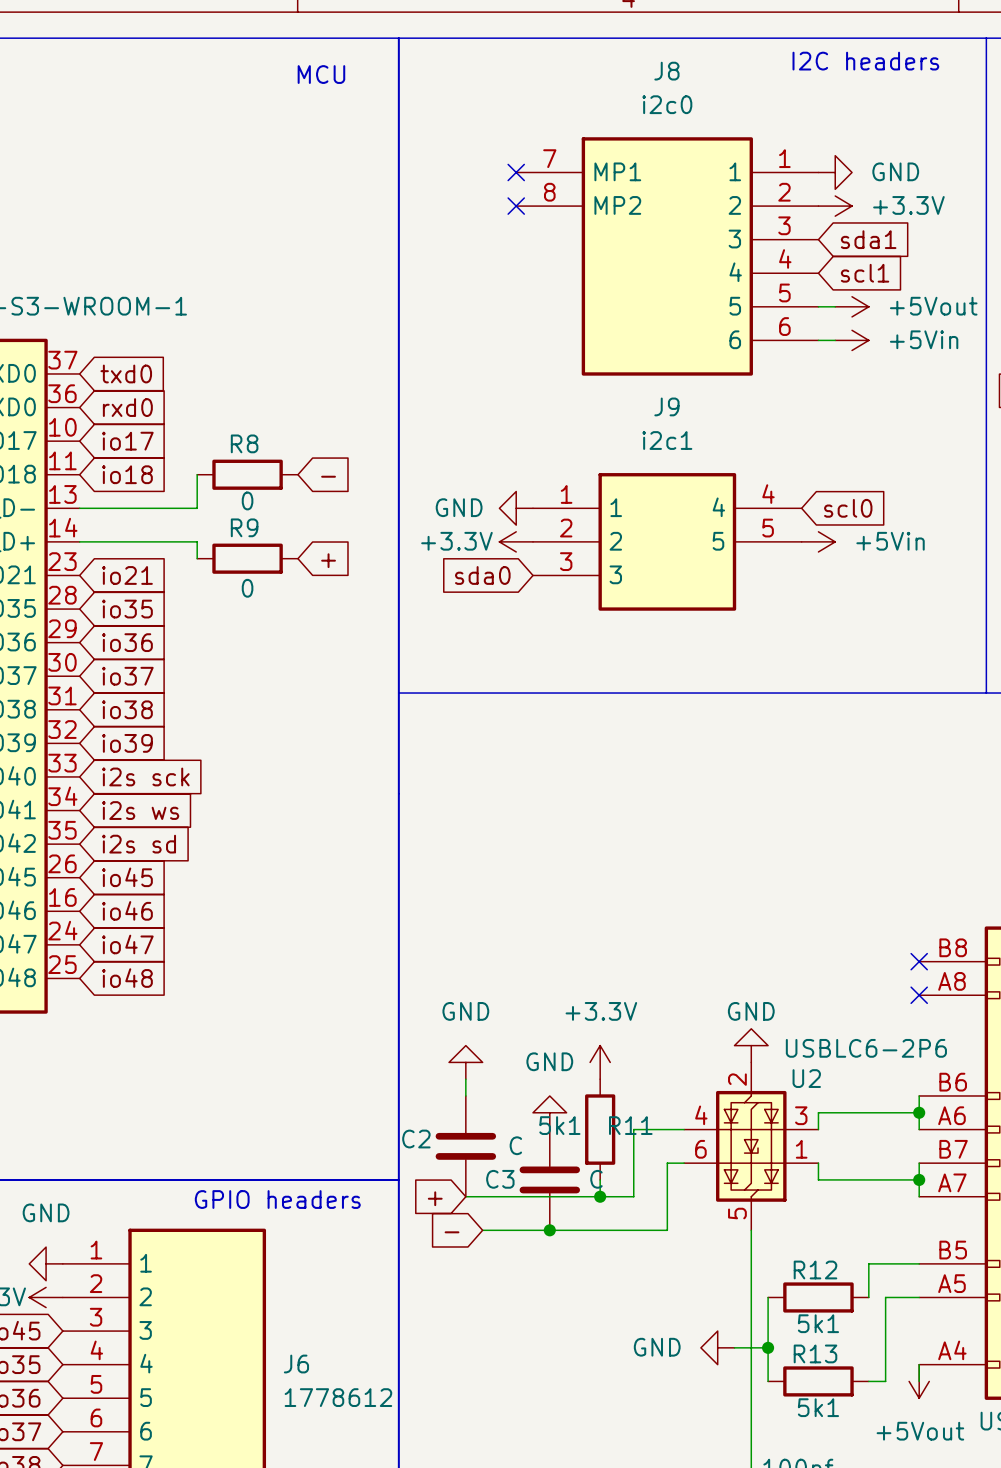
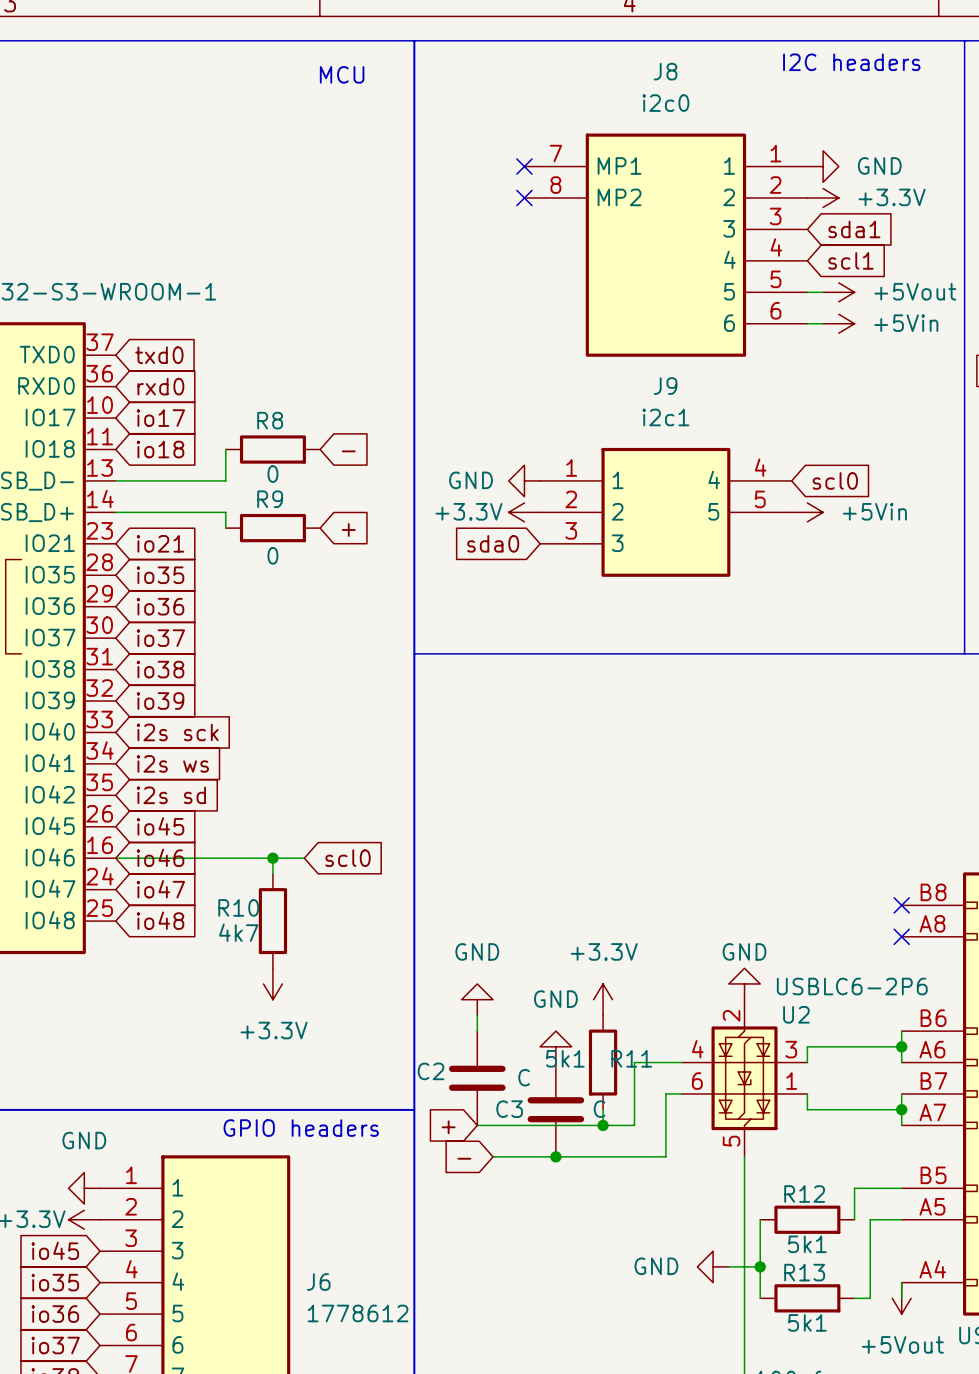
wire: none -> (115, 858) (304, 858)
wire: none -> (272, 858) (272, 873)
junction: none -> (272, 858)
global label: none -> scl0 (348, 858)
R10: none -> 4k7 (272, 921)
power symbol: none -> +3.3V (272, 983)

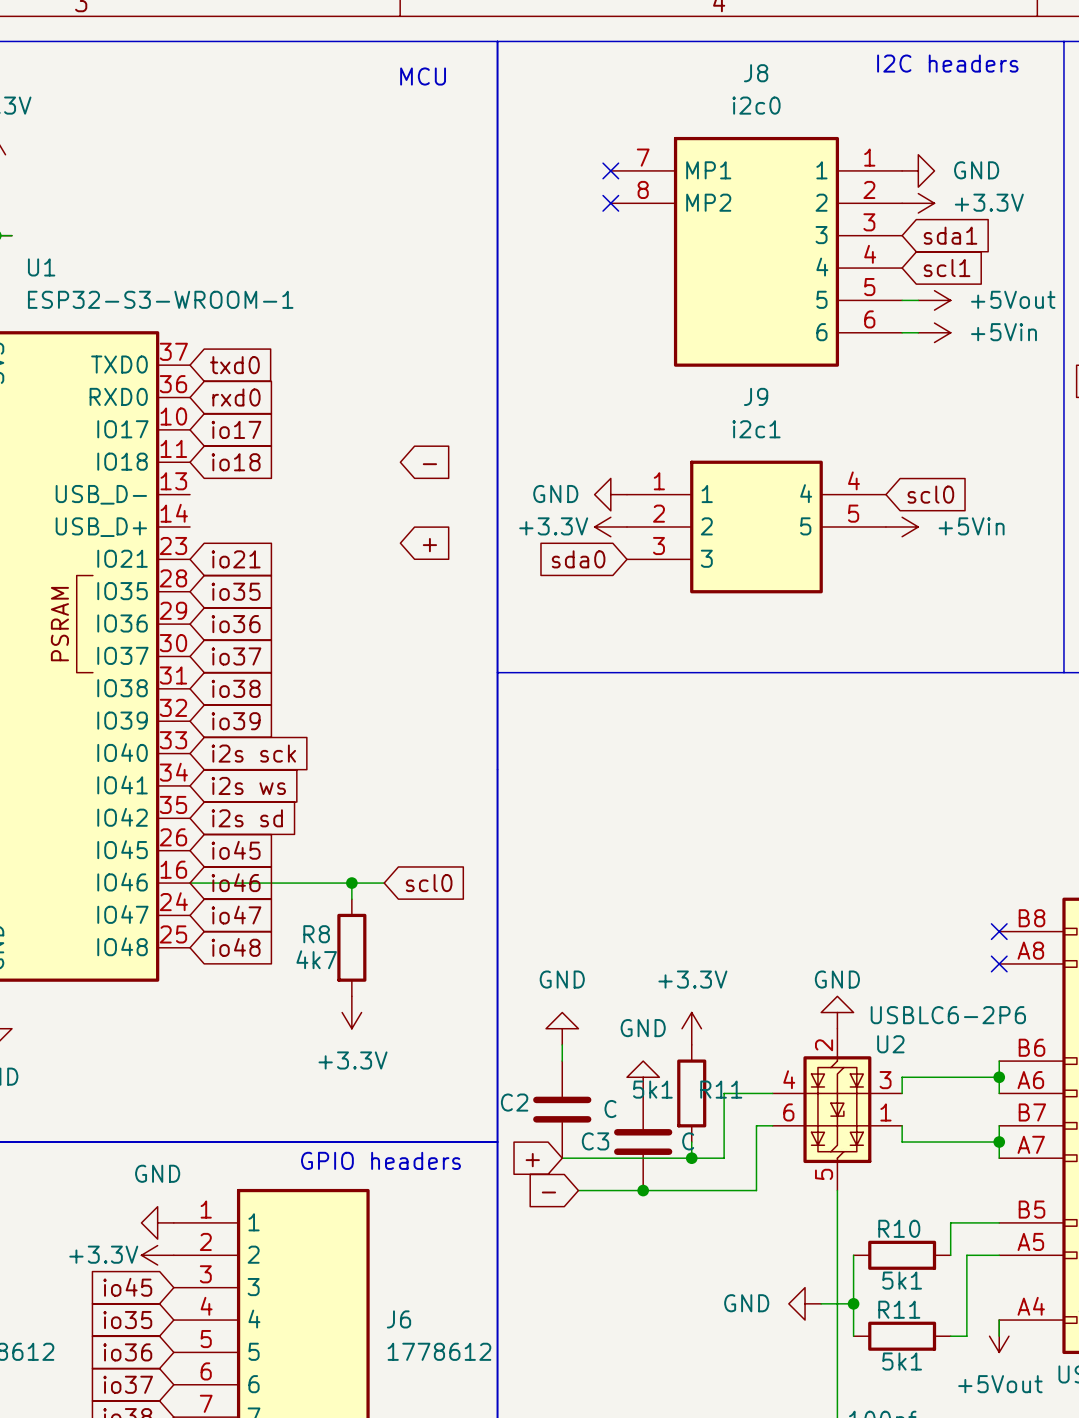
wire: (225, 449) (225, 480) (115, 480) -> none
R8: 0 (272, 449) -> none
wire: (115, 512) (225, 512) (225, 528) -> none
R9: 0 (272, 528) -> none
R10 name: R10 (238, 907) -> R8 (316, 934)
R12 name: R12 (804, 1194) -> R10 (899, 1228)
R13 name: R13 (804, 1272) -> R11 (899, 1309)

